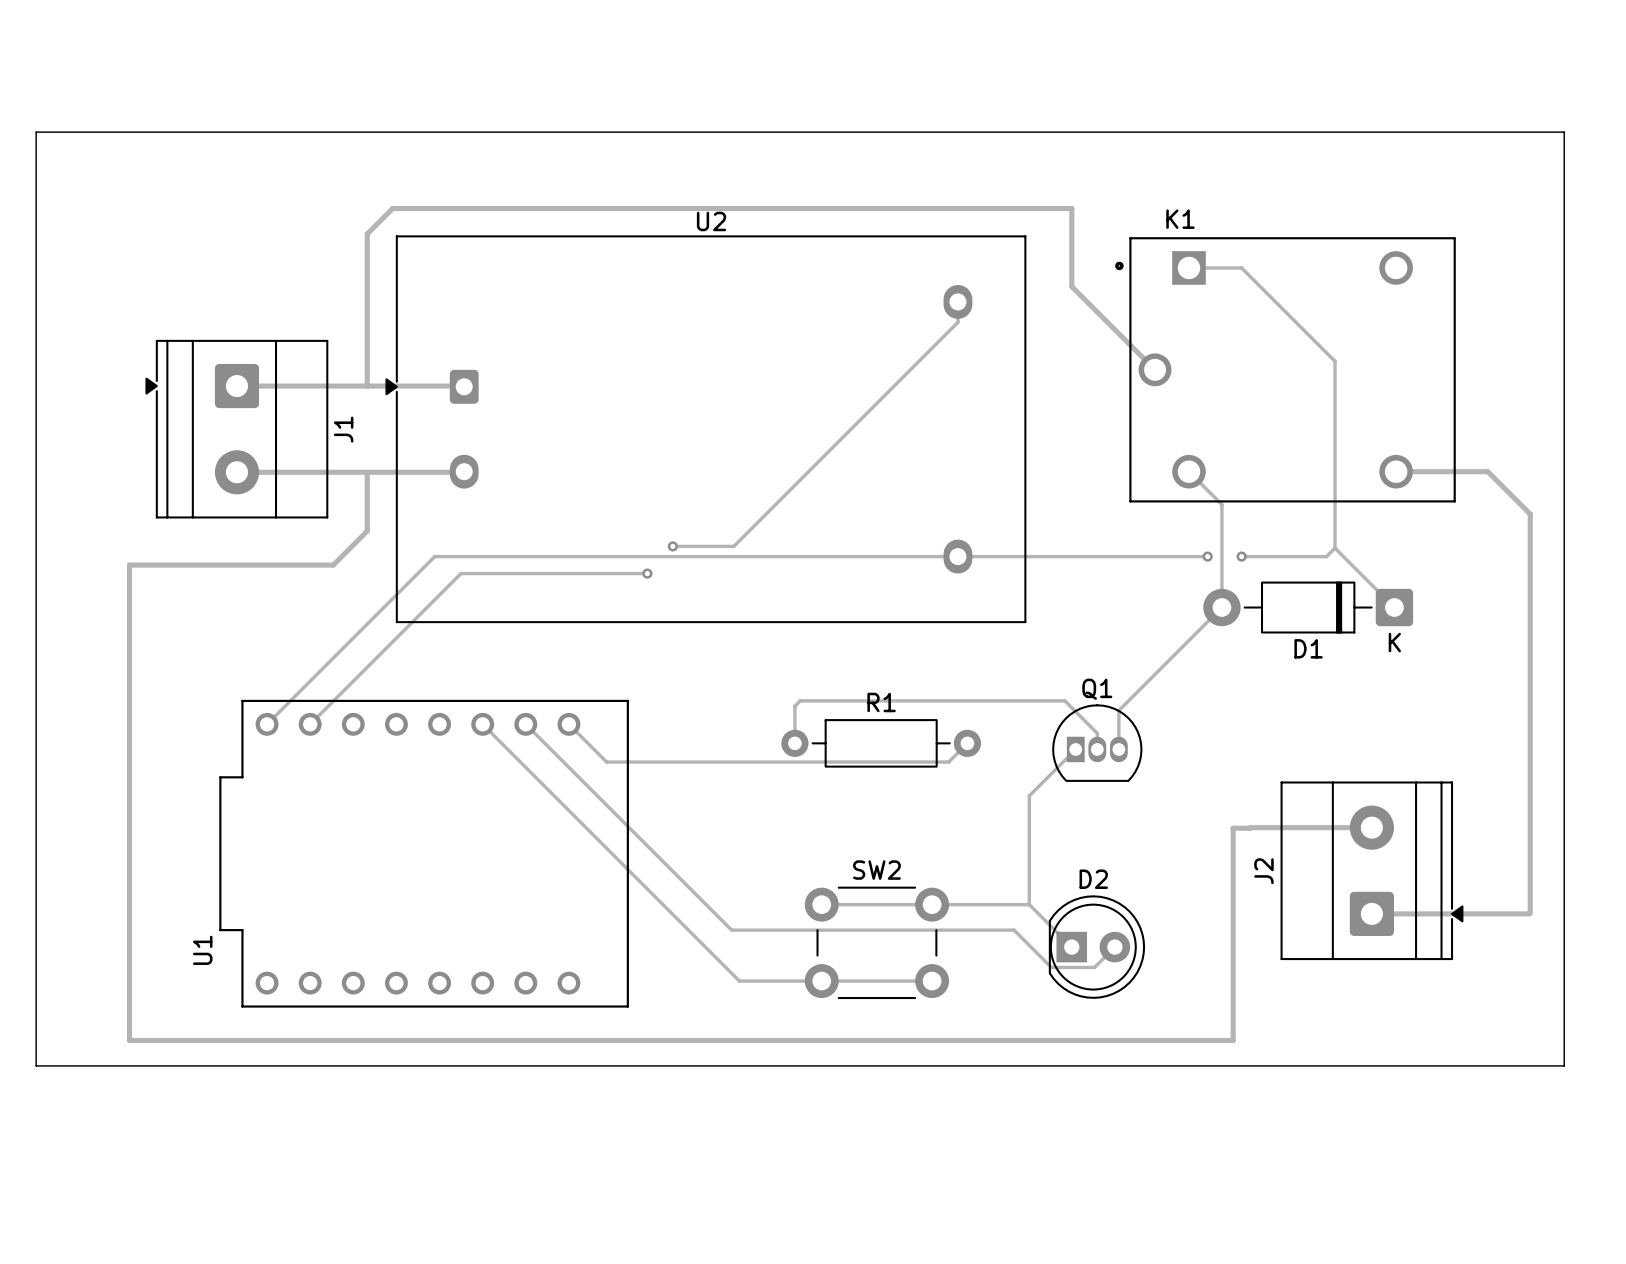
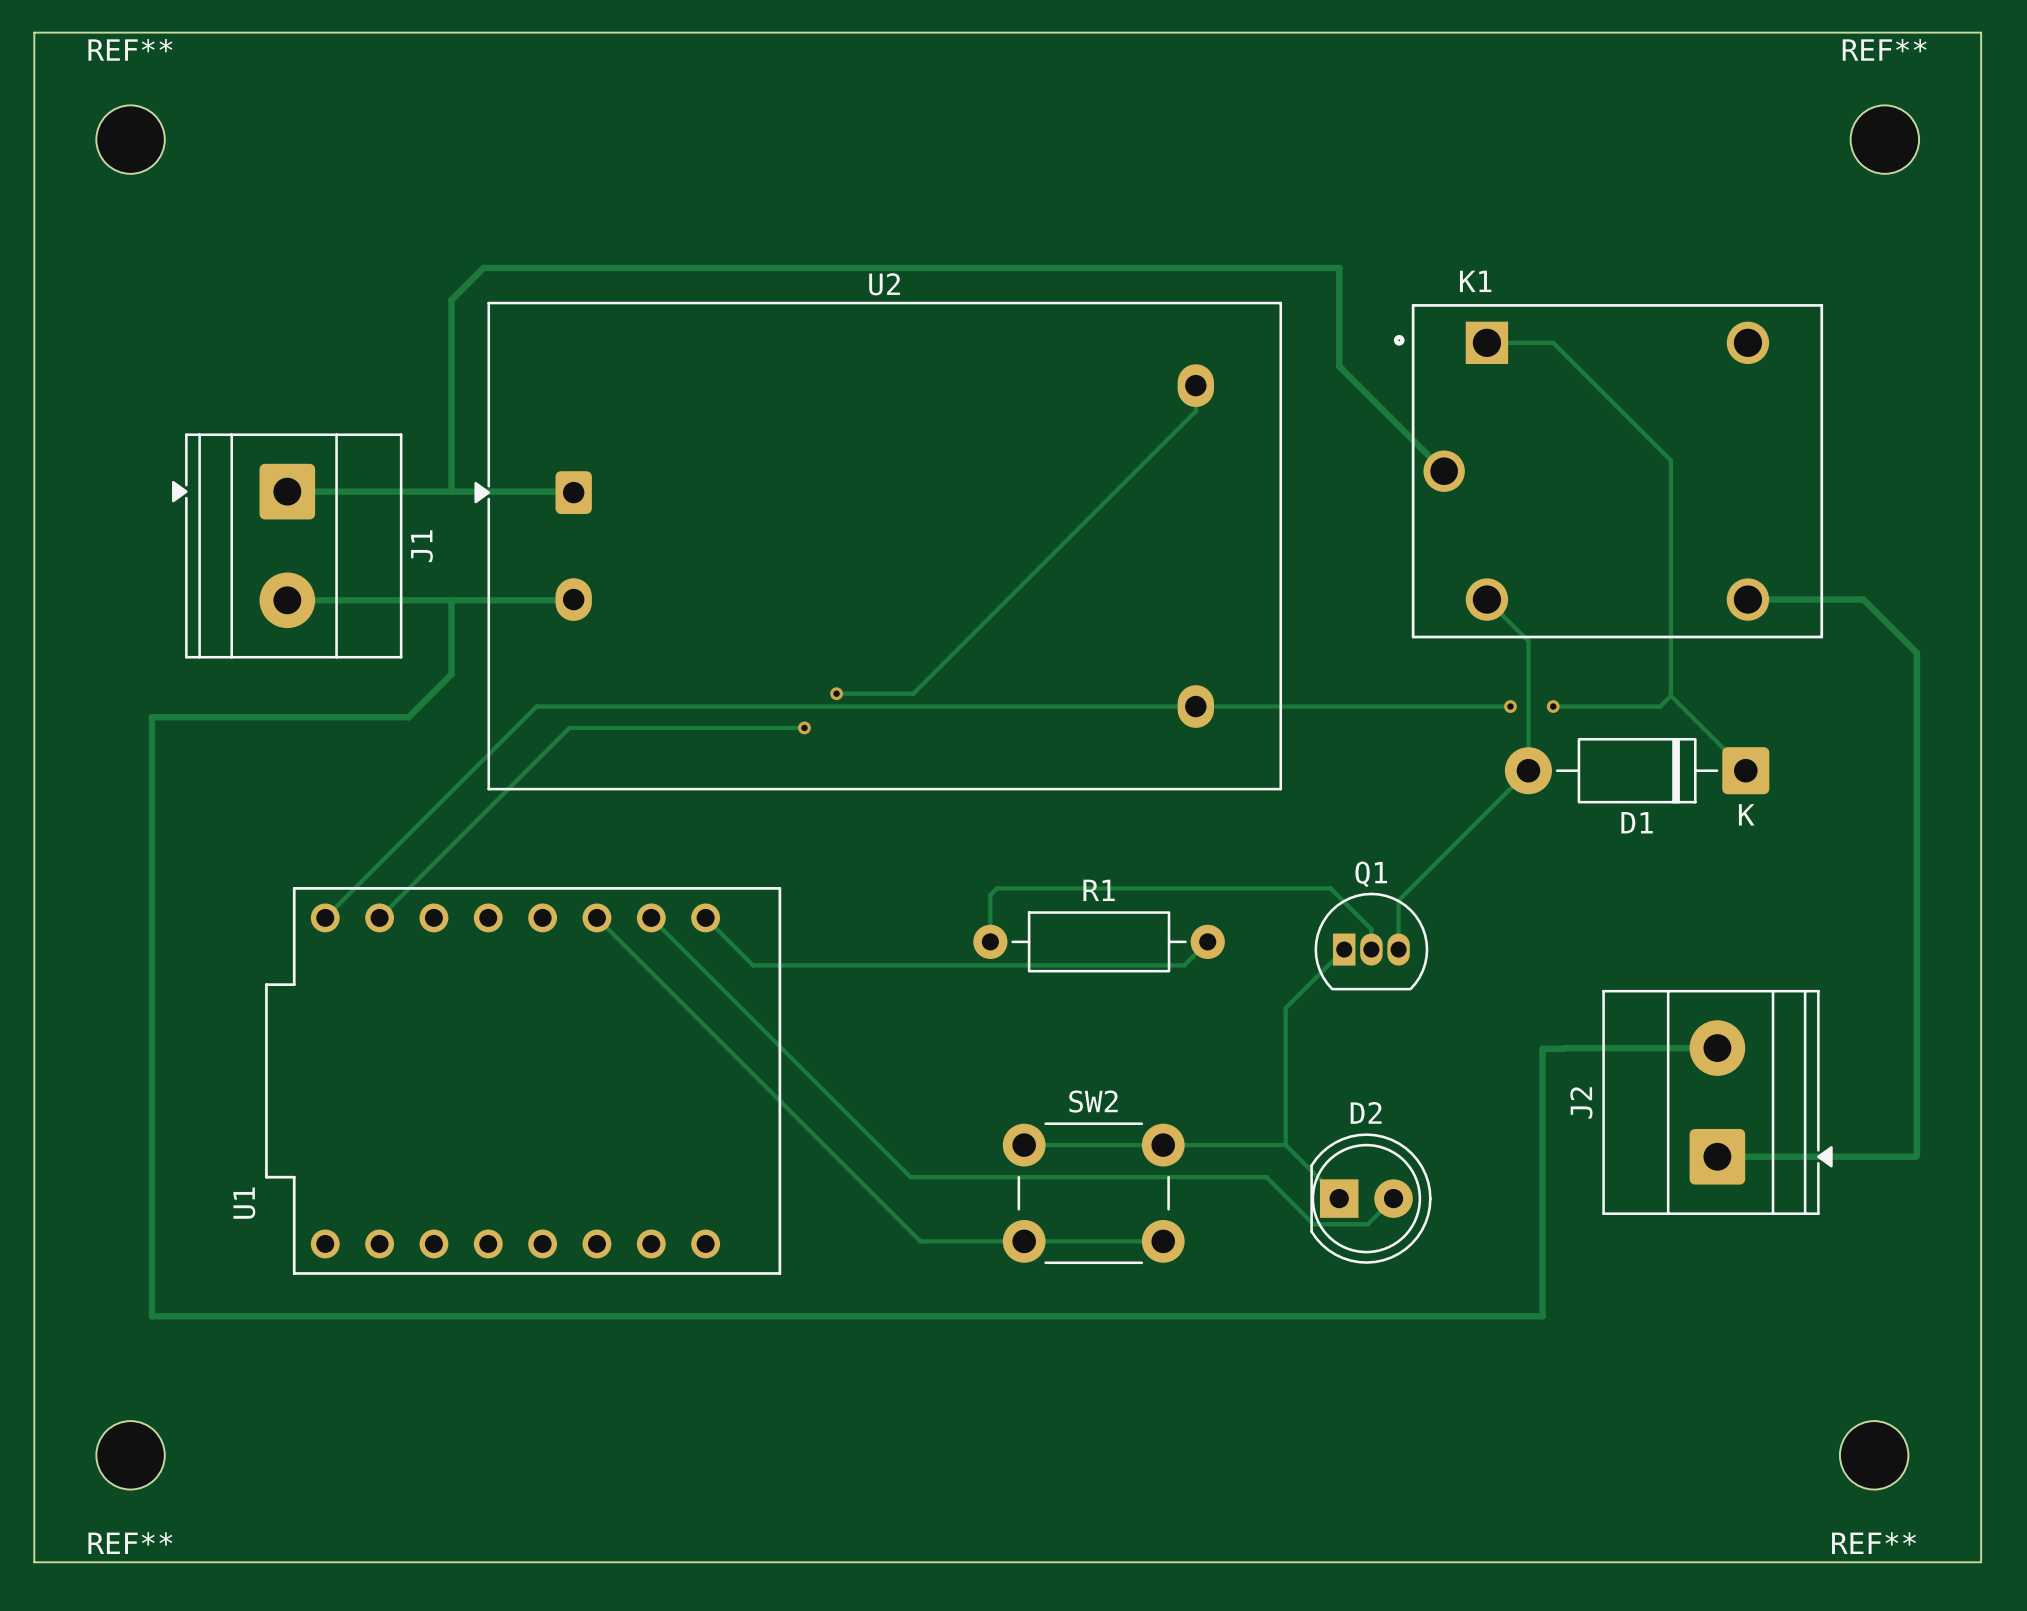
REF**: none -> (130, 139)
REF**: none -> (1884, 139)
board edge: (36, 132) (1564, 132) (1564, 1065) (36, 1065) -> (34, 171) (34, 32) (1981, 32) (1981, 1562) (34, 1562) (34, 1348)
REF**: none -> (130, 1455)
REF**: none -> (1874, 1455)

